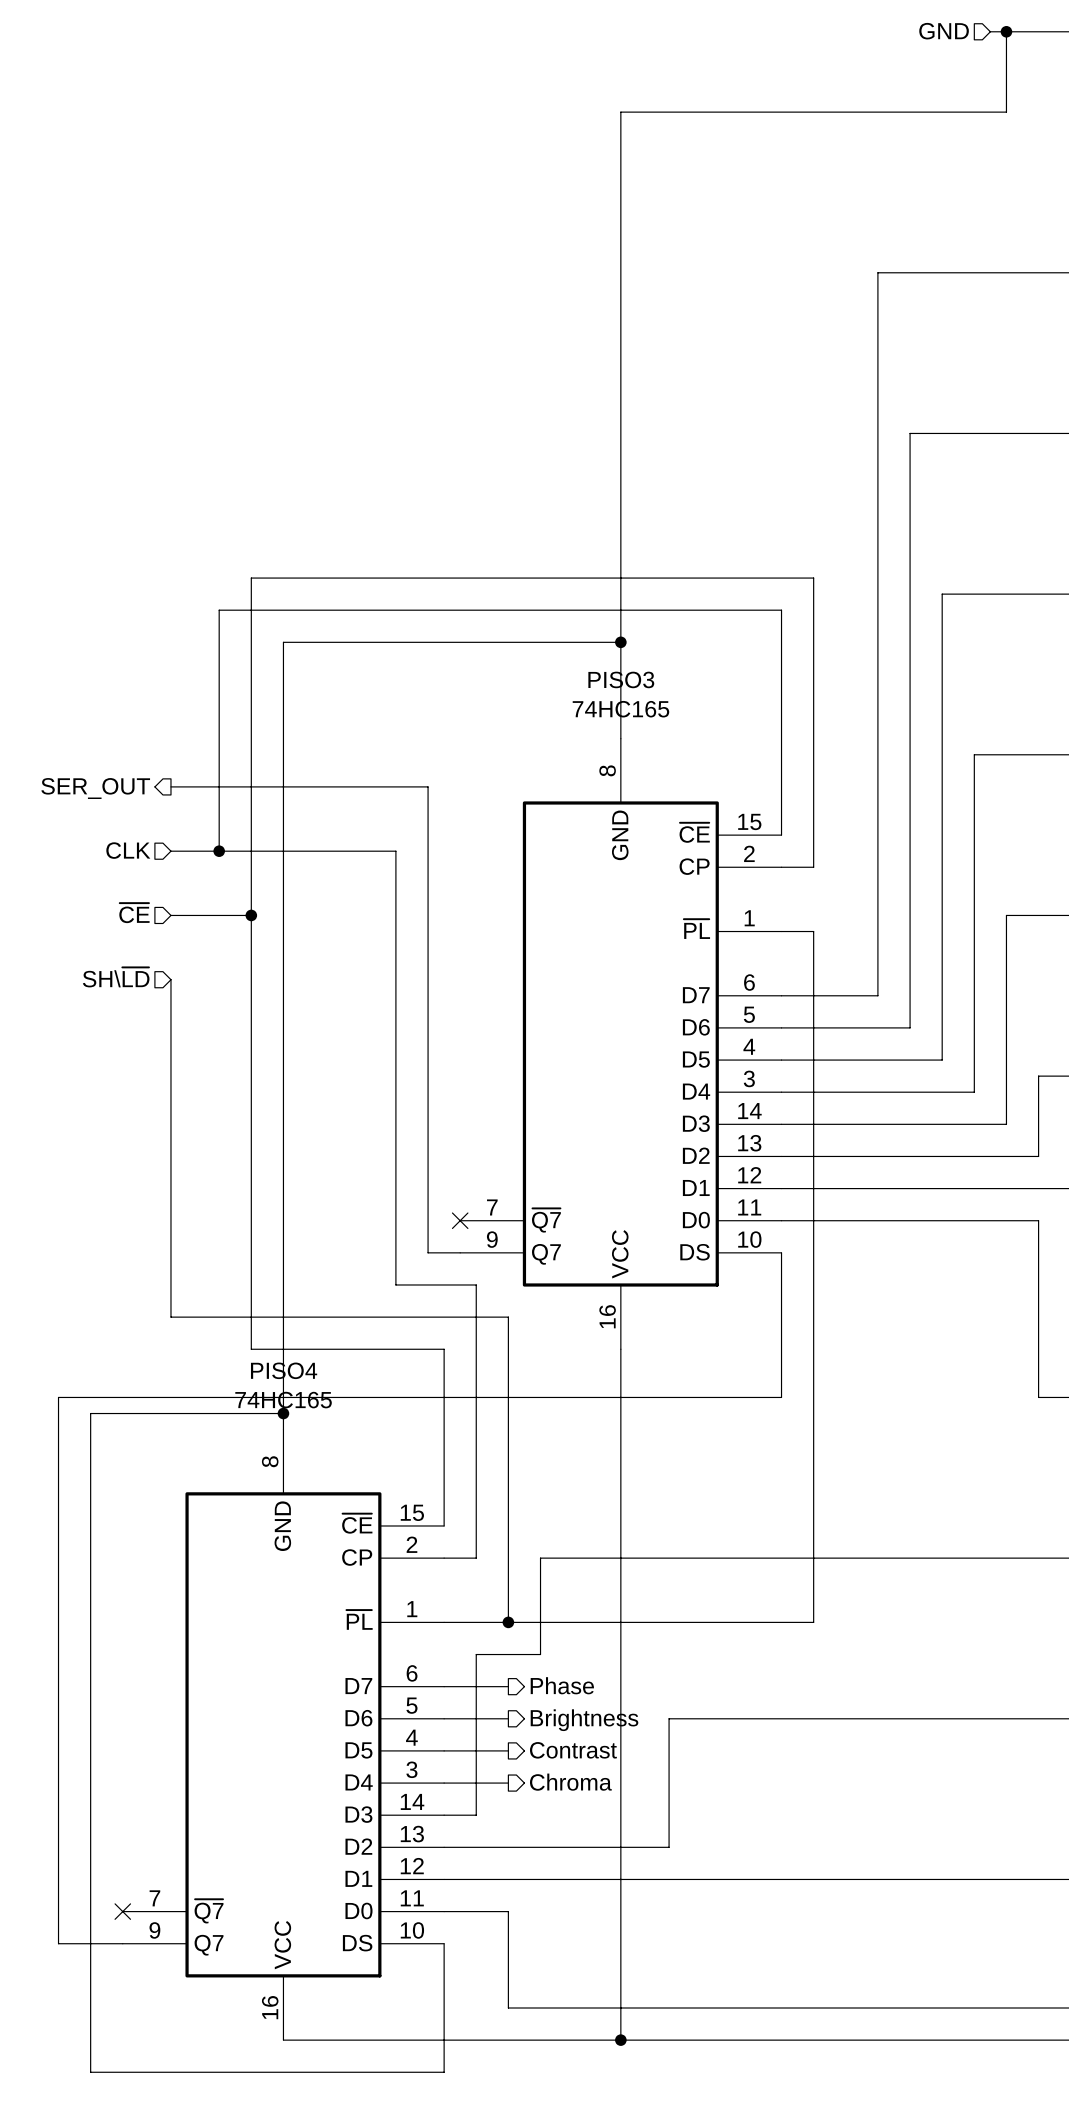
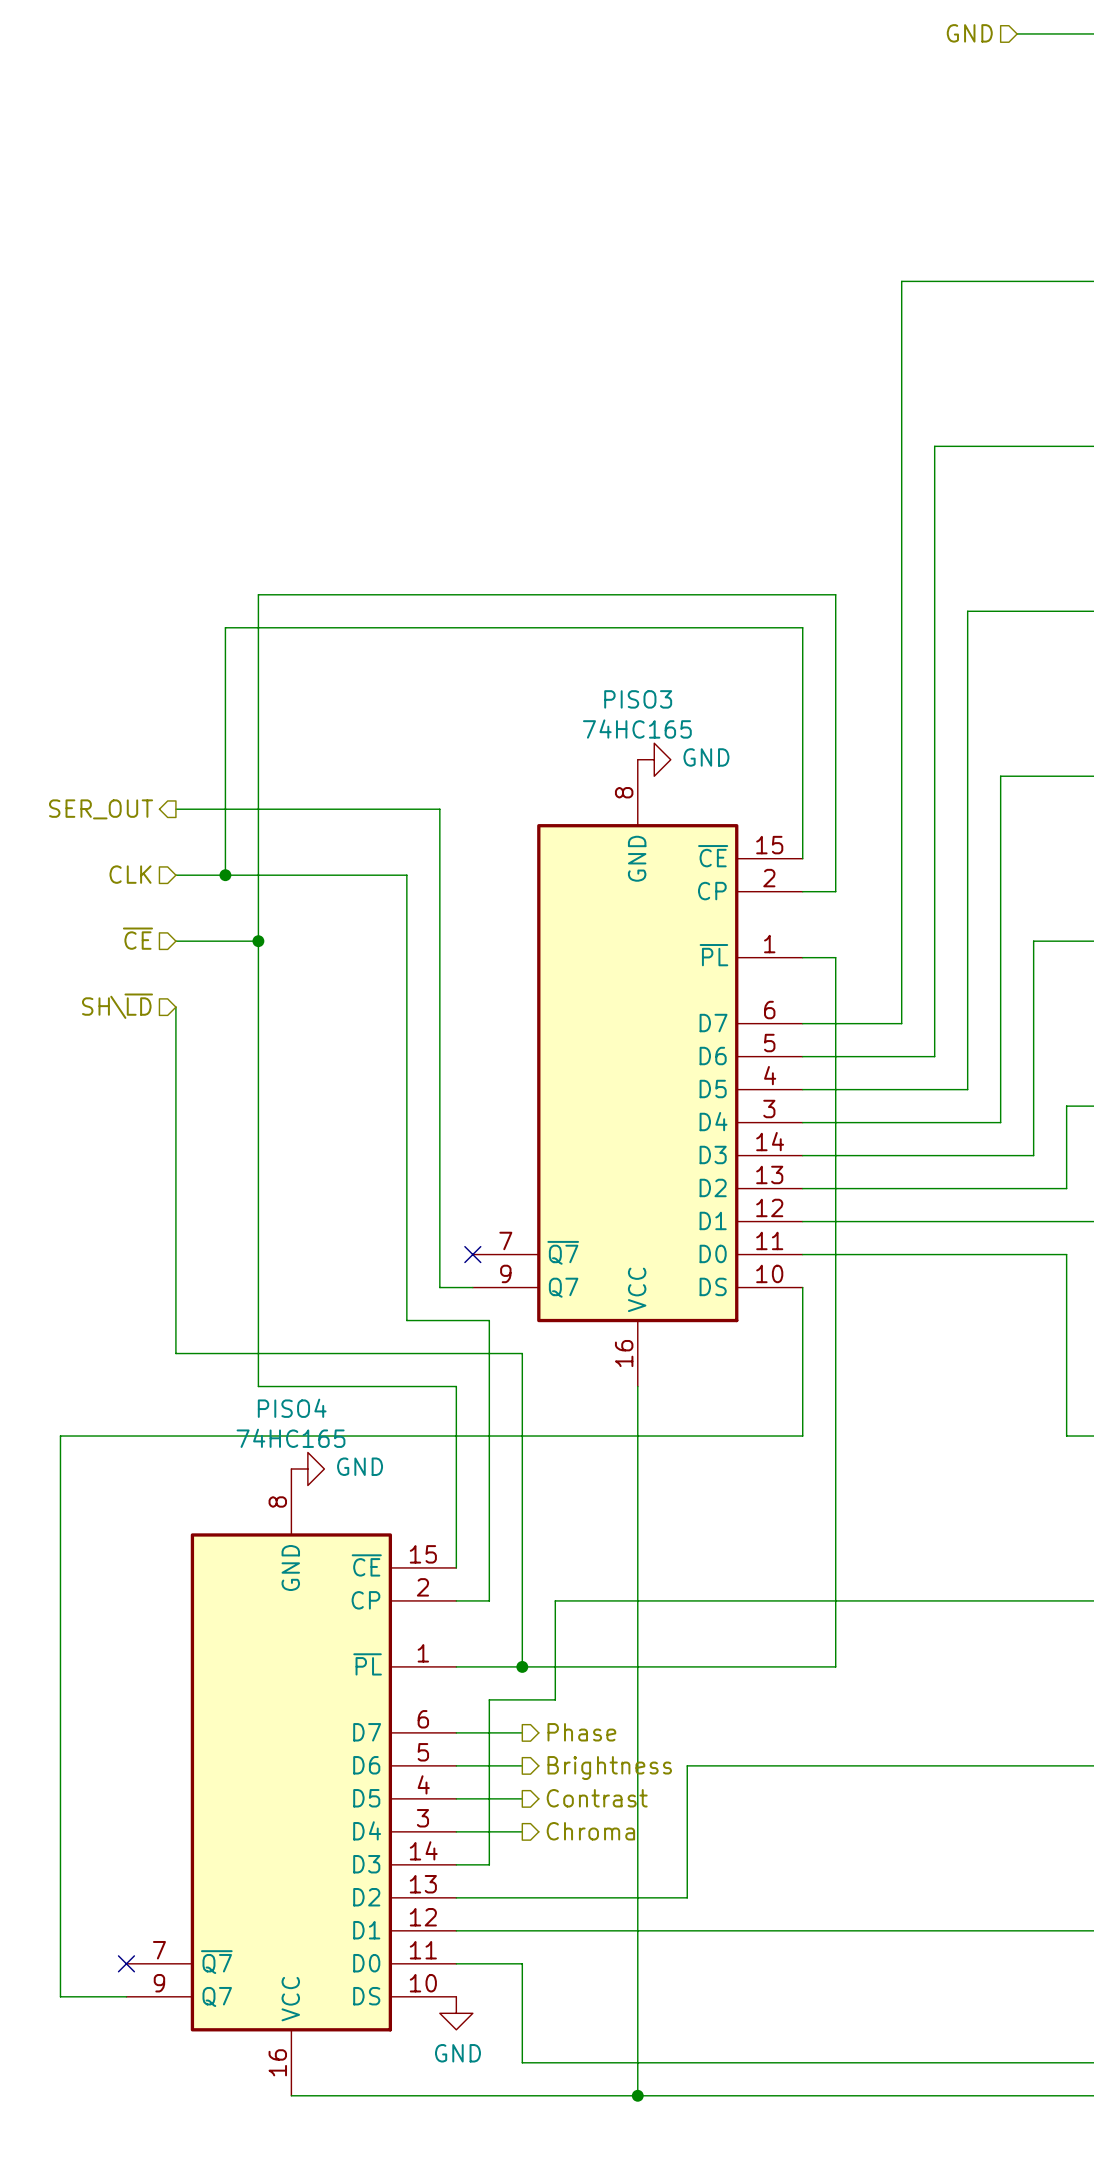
wire: (1006, 31) (1006, 112) (620, 112) (620, 738) -> none
junction: (1006, 31) -> none
wire: (620, 642) (283, 642) (283, 1429) -> none
junction: (620, 642) -> none
power symbol: none -> GND (654, 759)
wire: (283, 1413) (90, 1413) (90, 2072) (444, 2072) (444, 1943) -> none
junction: (283, 1413) -> none
power symbol: none -> GND (307, 1468)
power symbol: none -> GND (456, 2013)

